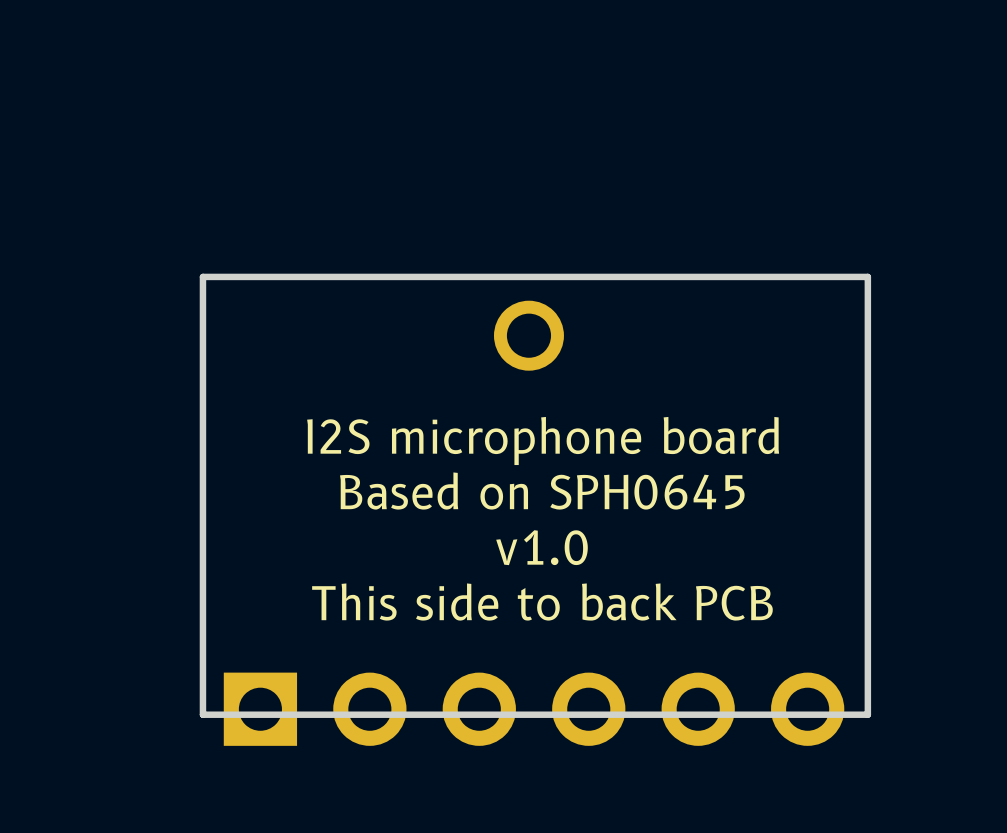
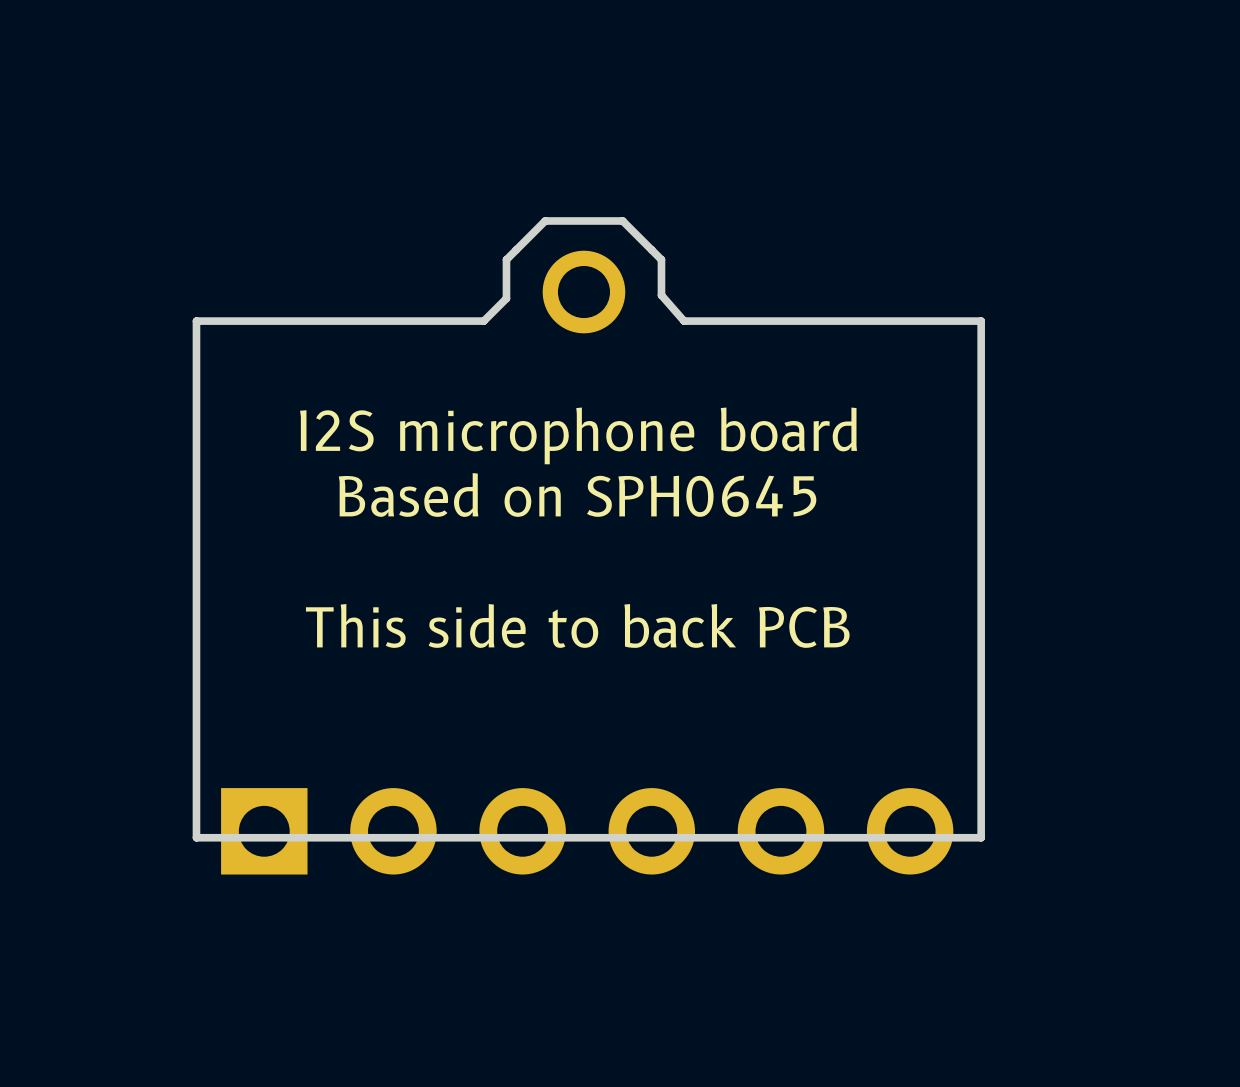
board edge: (616, 276) (446, 276) -> (684, 321) (661, 295) (661, 259) (622, 220) (545, 220) (506, 259) (506, 298) (483, 321)
part position: (528, 335) -> (583, 292)
text position: I2S microphone board (543, 440) -> I2S microphone board (578, 435)
text position: Based on SPH0645 (542, 491) -> Based on SPH0645 (577, 494)
text: v1.0 (541, 547) -> none
text position: This side to back PCB (542, 602) -> This side to back PCB (577, 625)

